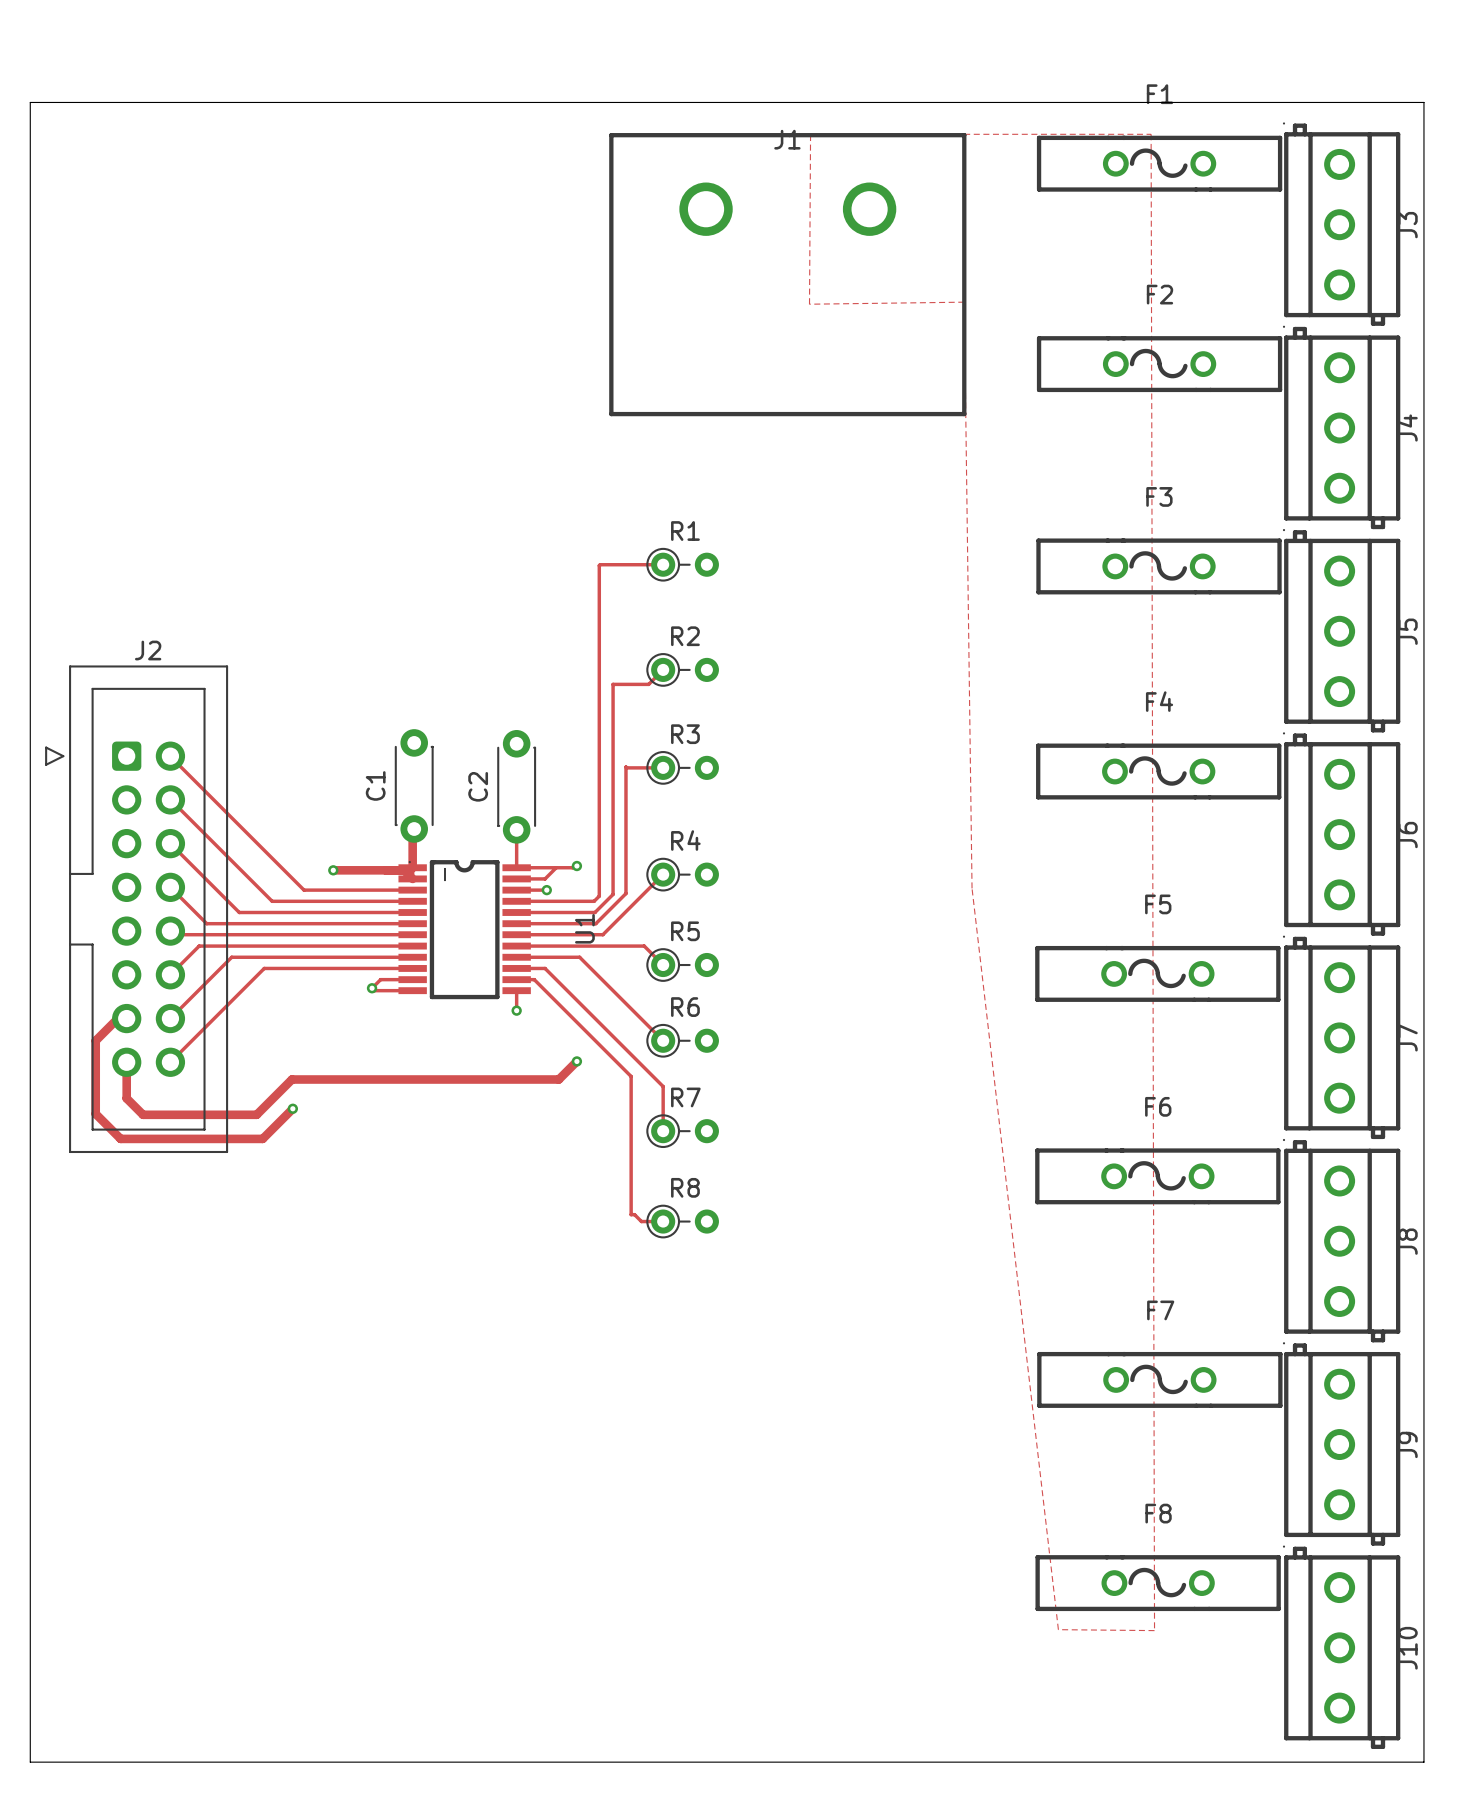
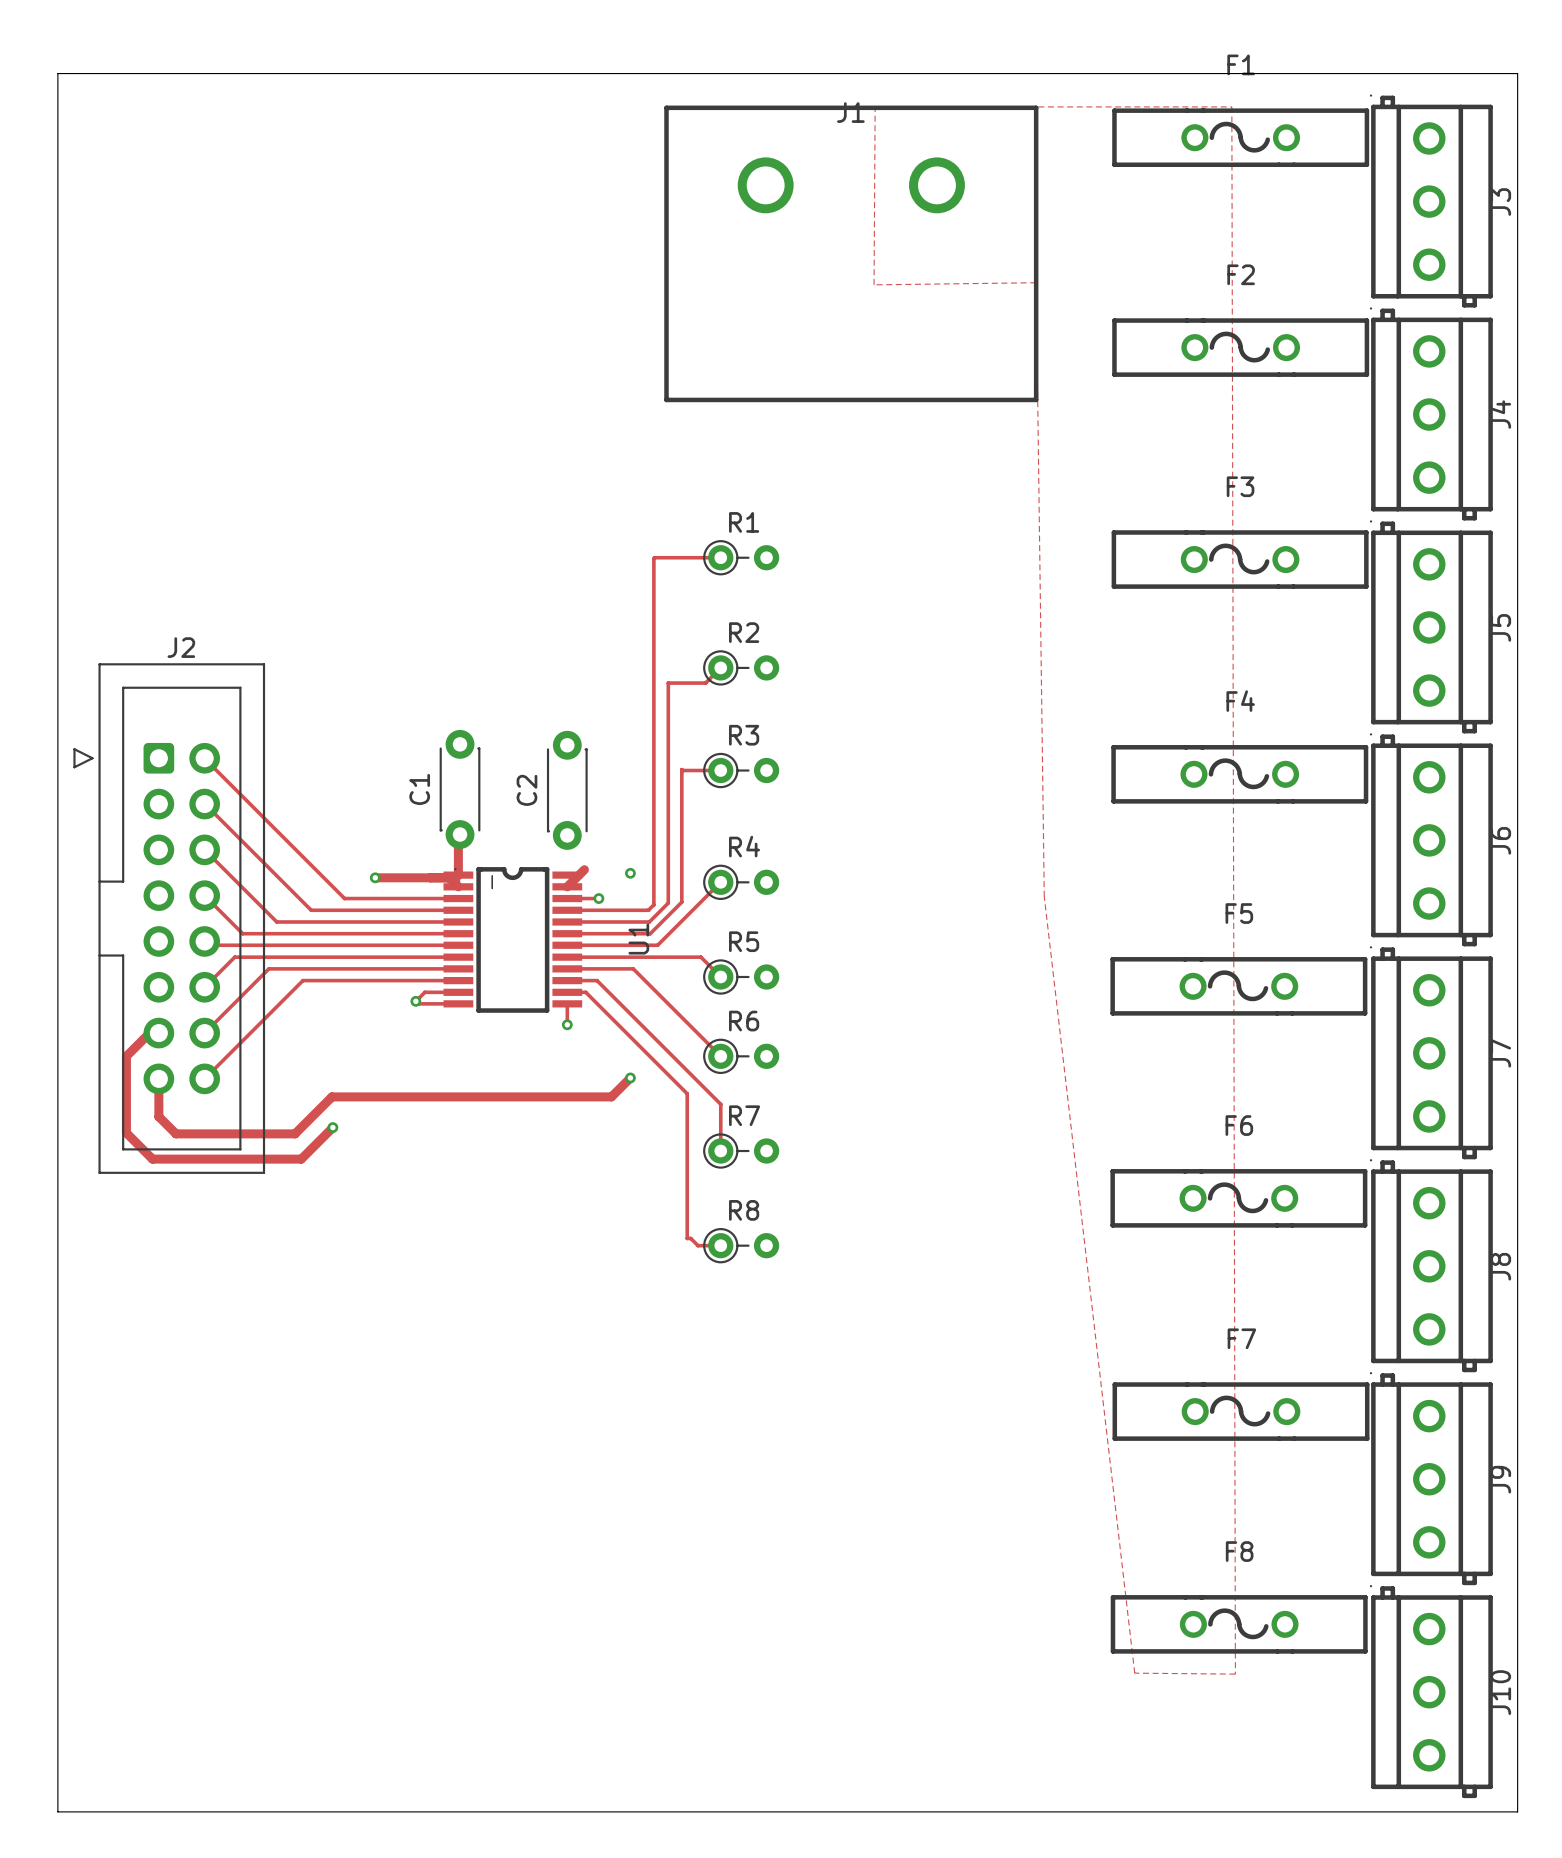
track: (516, 829) (516, 867) (572, 867) (576, 866) -> none
track: (556, 867) (545, 878) (516, 878) -> (584, 869) (567, 886)

